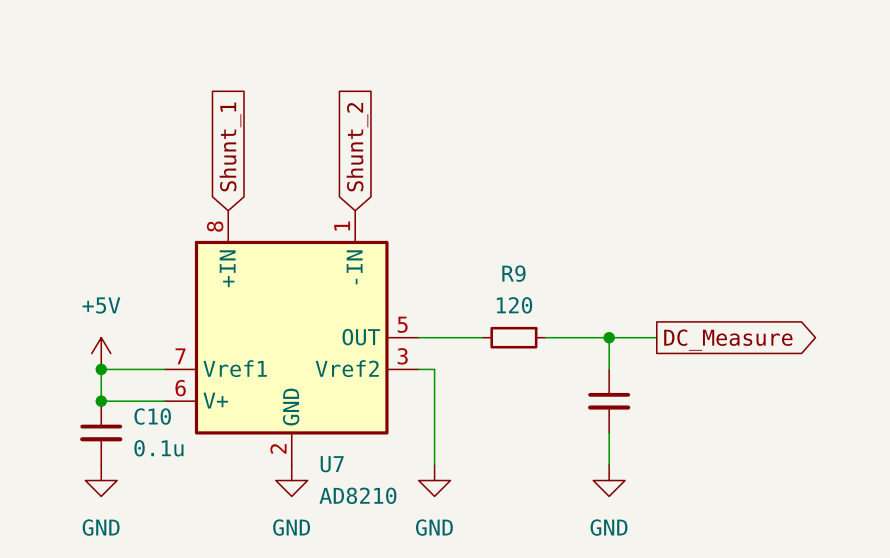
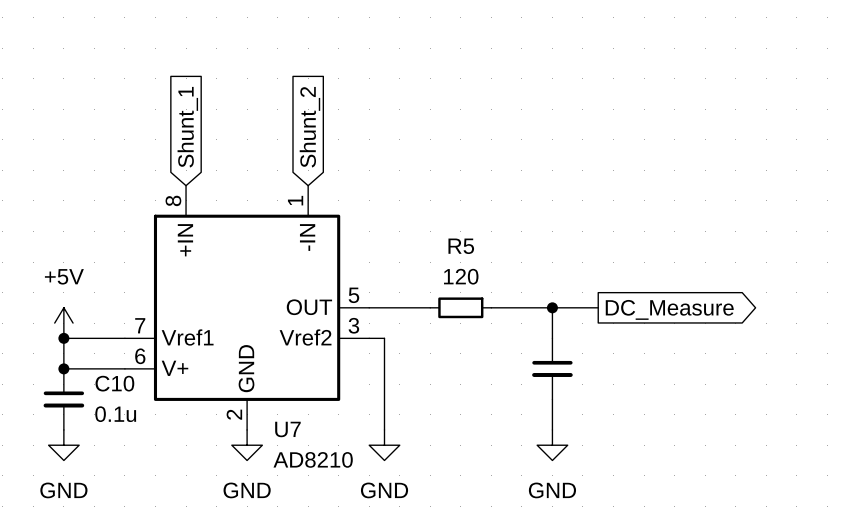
R9 name: R9 (513, 273) -> R5 (461, 246)

